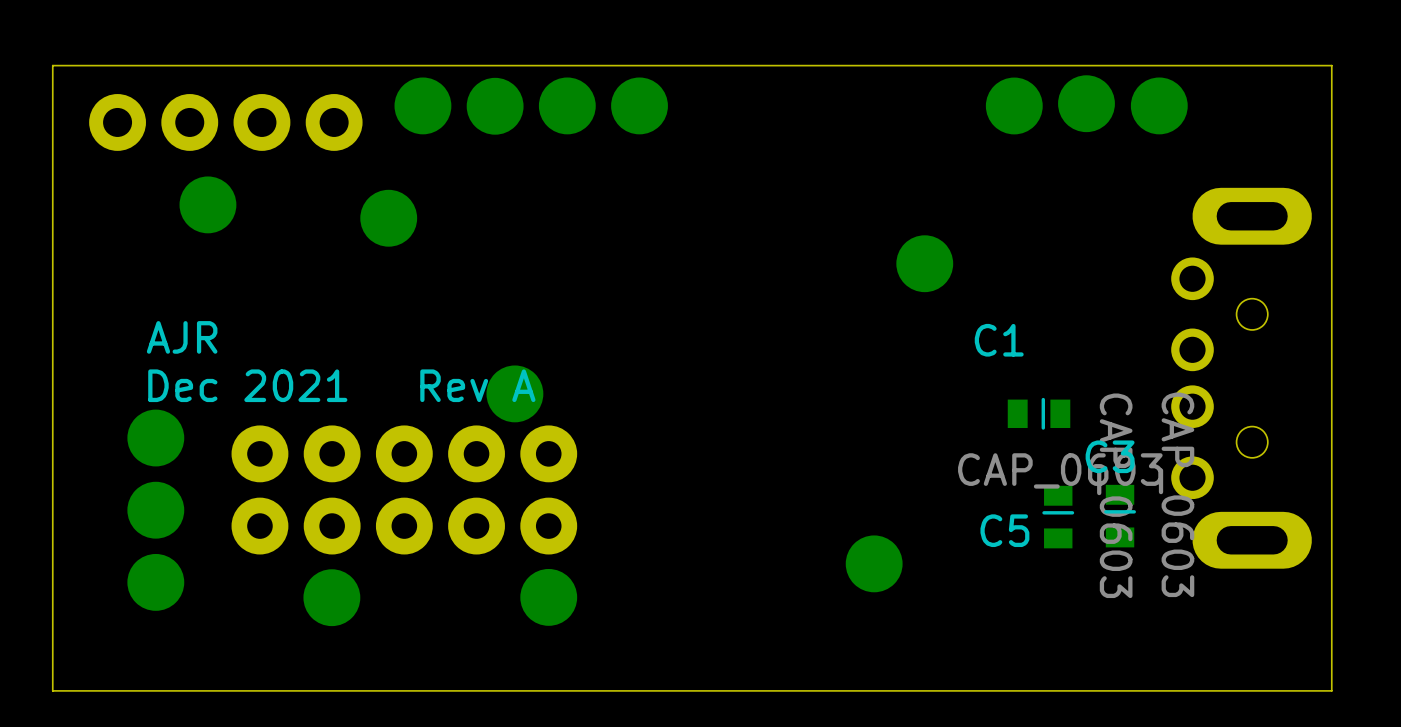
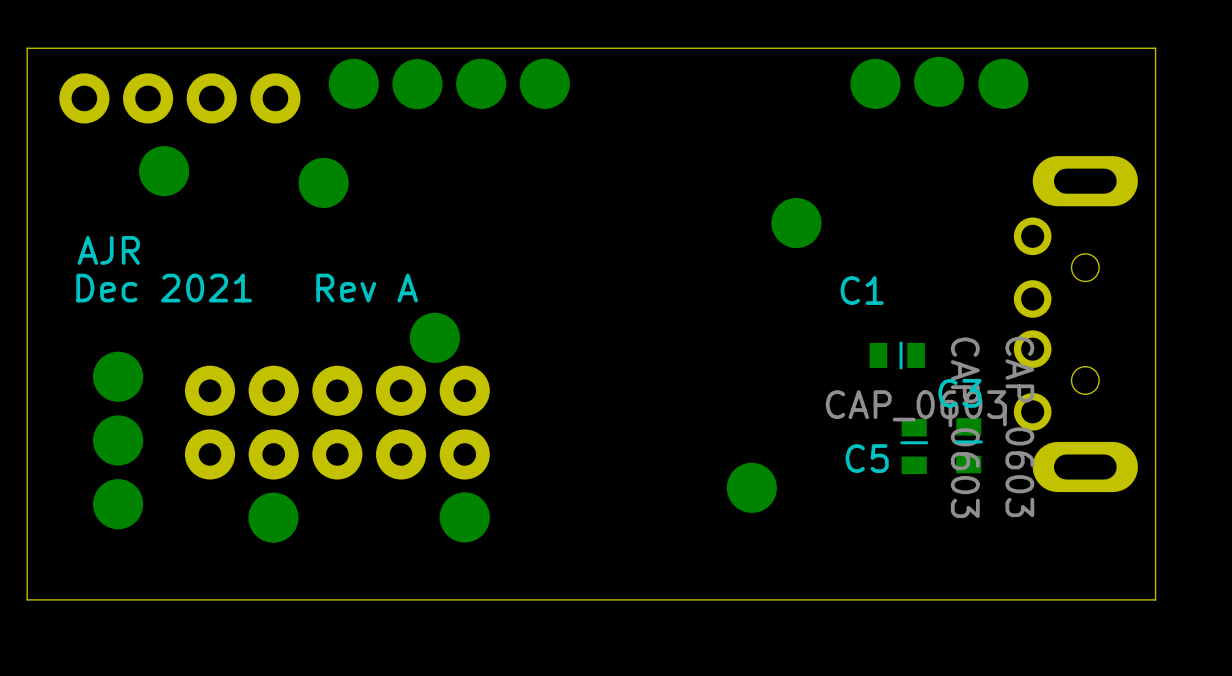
text position: AJR (182, 337) -> AJR (108, 250)
text position: Dec 2021 Rev A (341, 385) -> Dec 2021 Rev A (247, 288)

